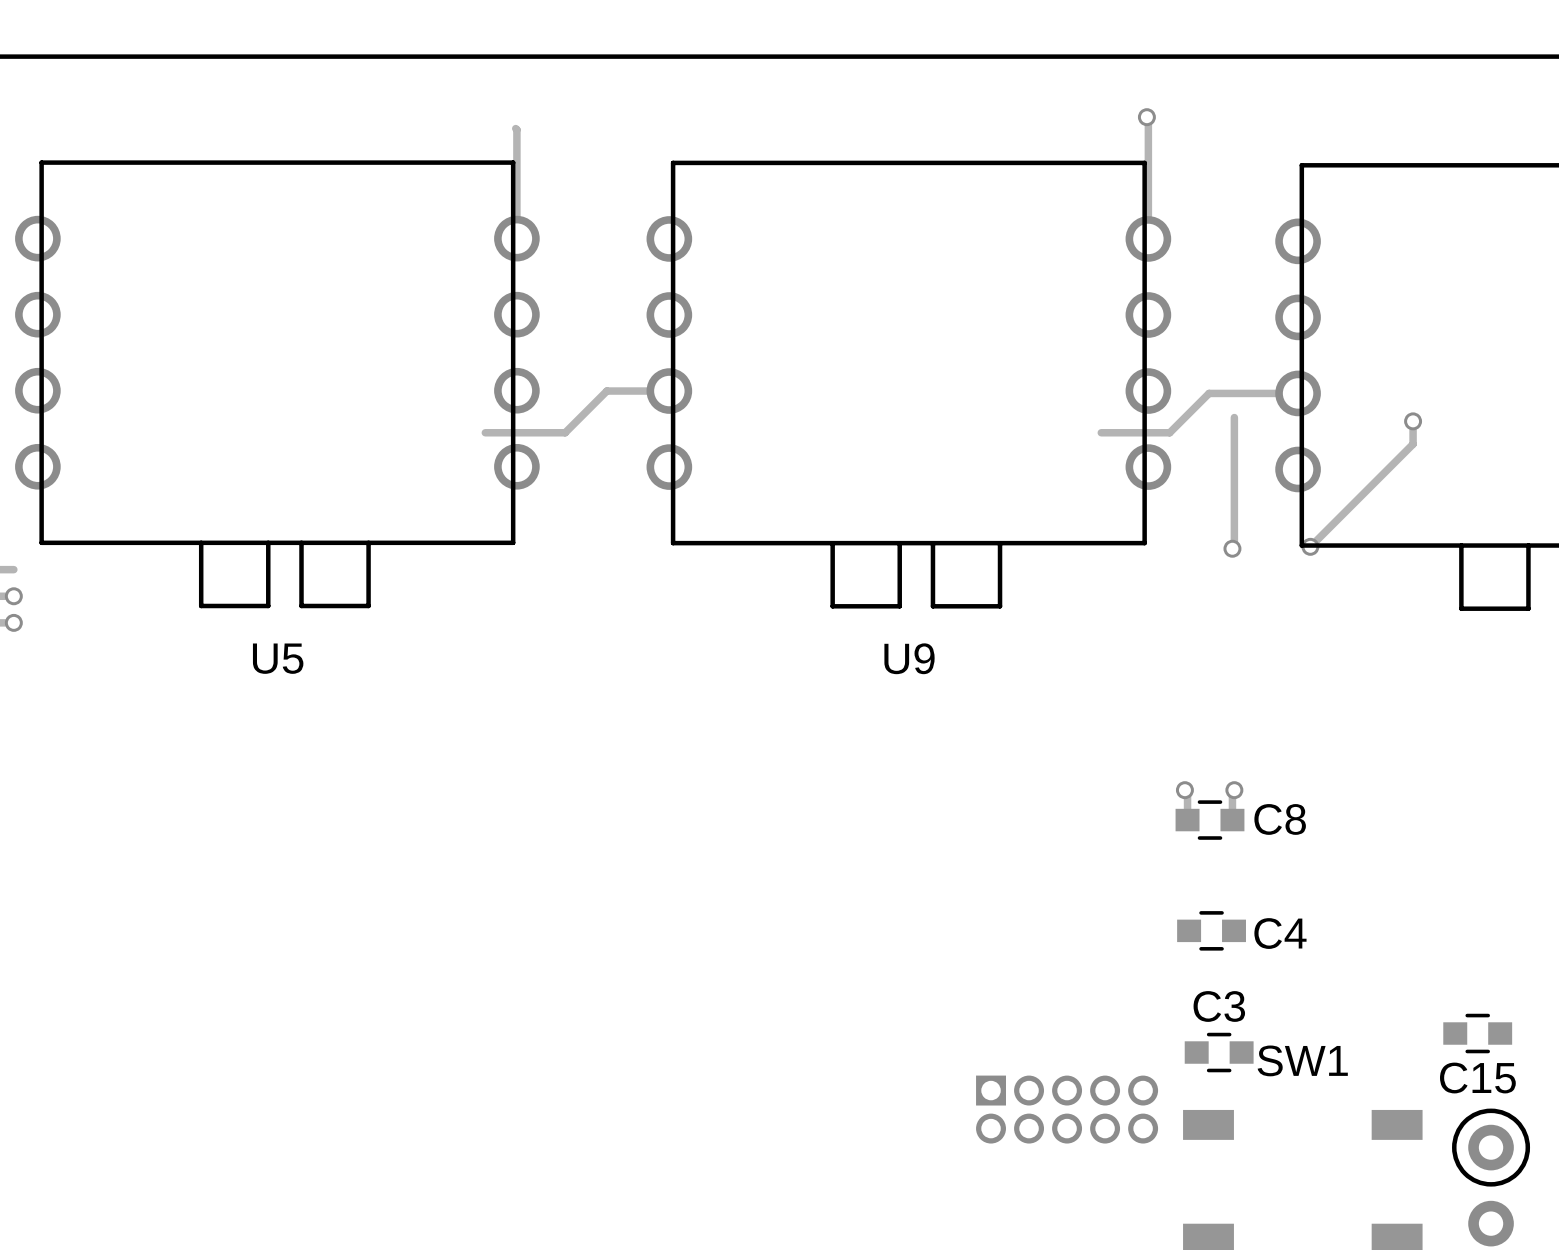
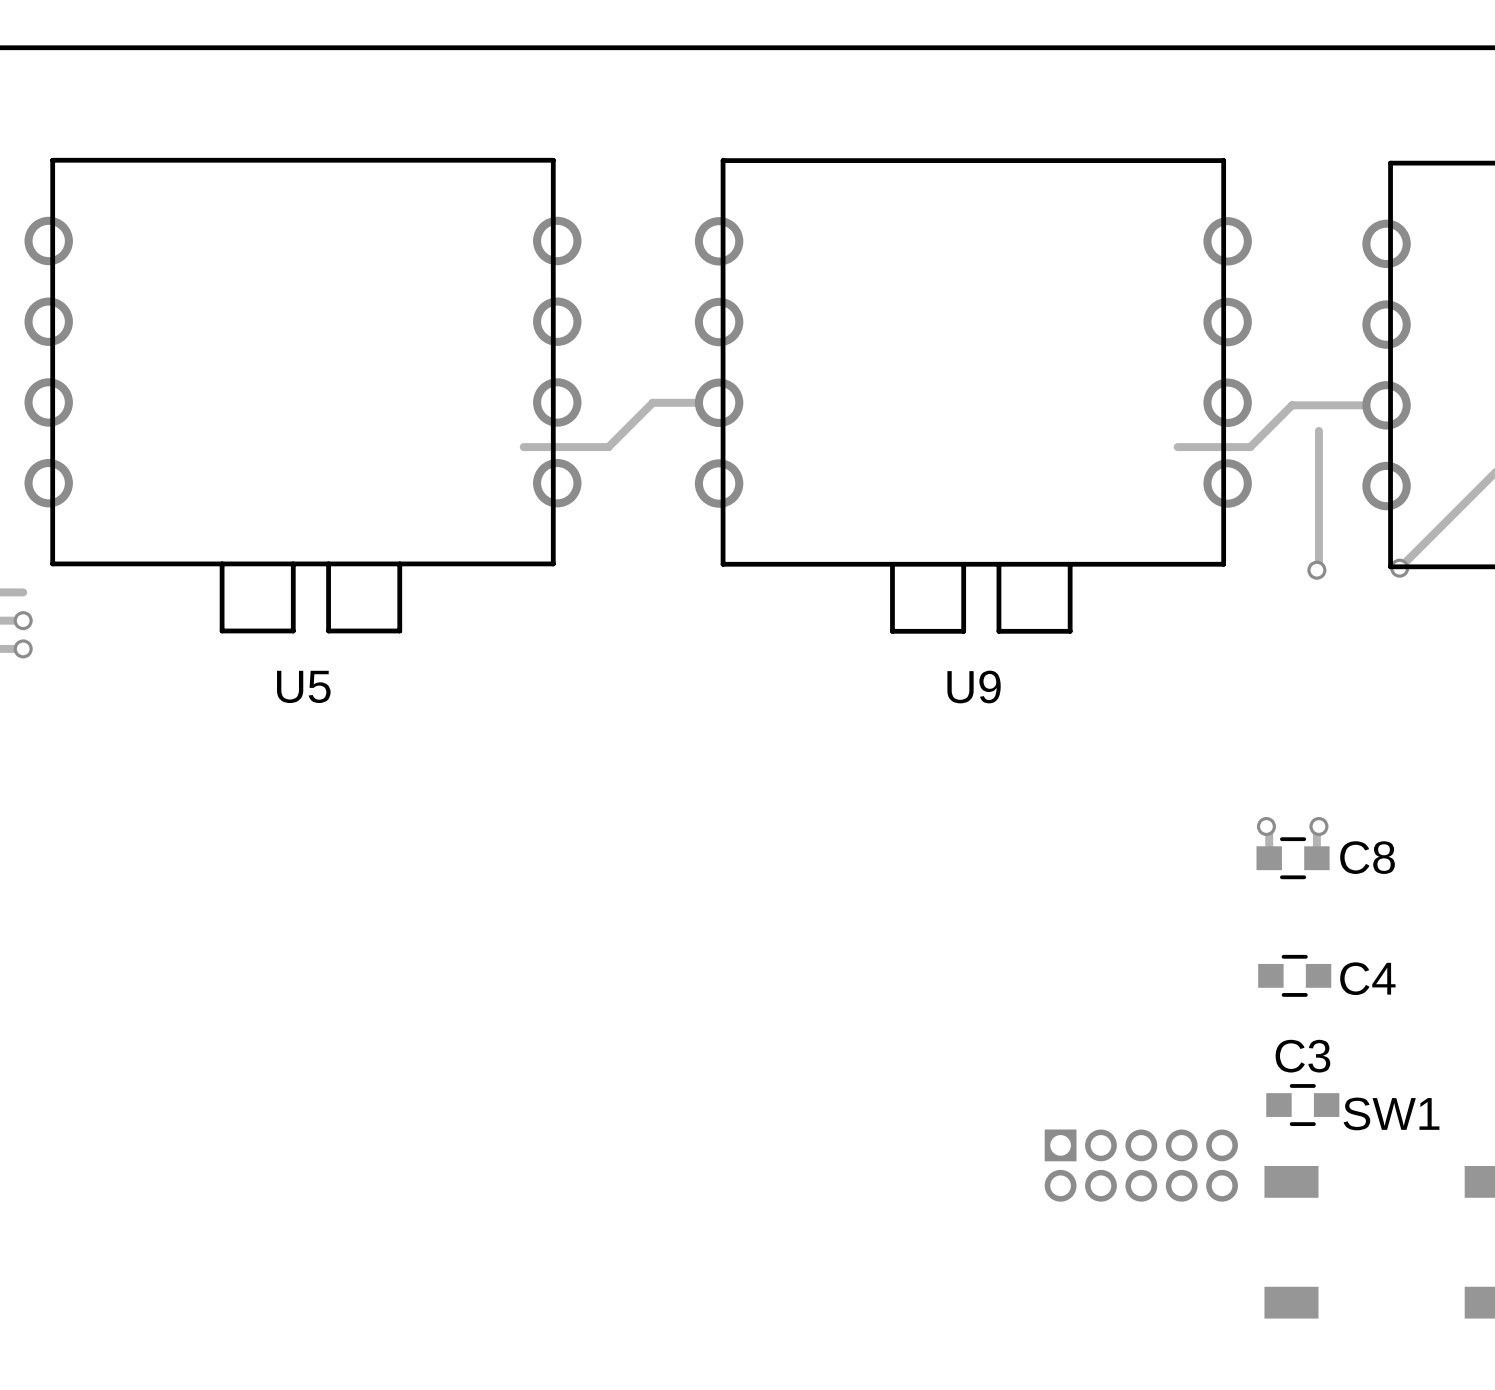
track: (1146, 117) (1148, 238) -> none
via: (1146, 117) -> none
track: (515, 128) (516, 238) -> none

